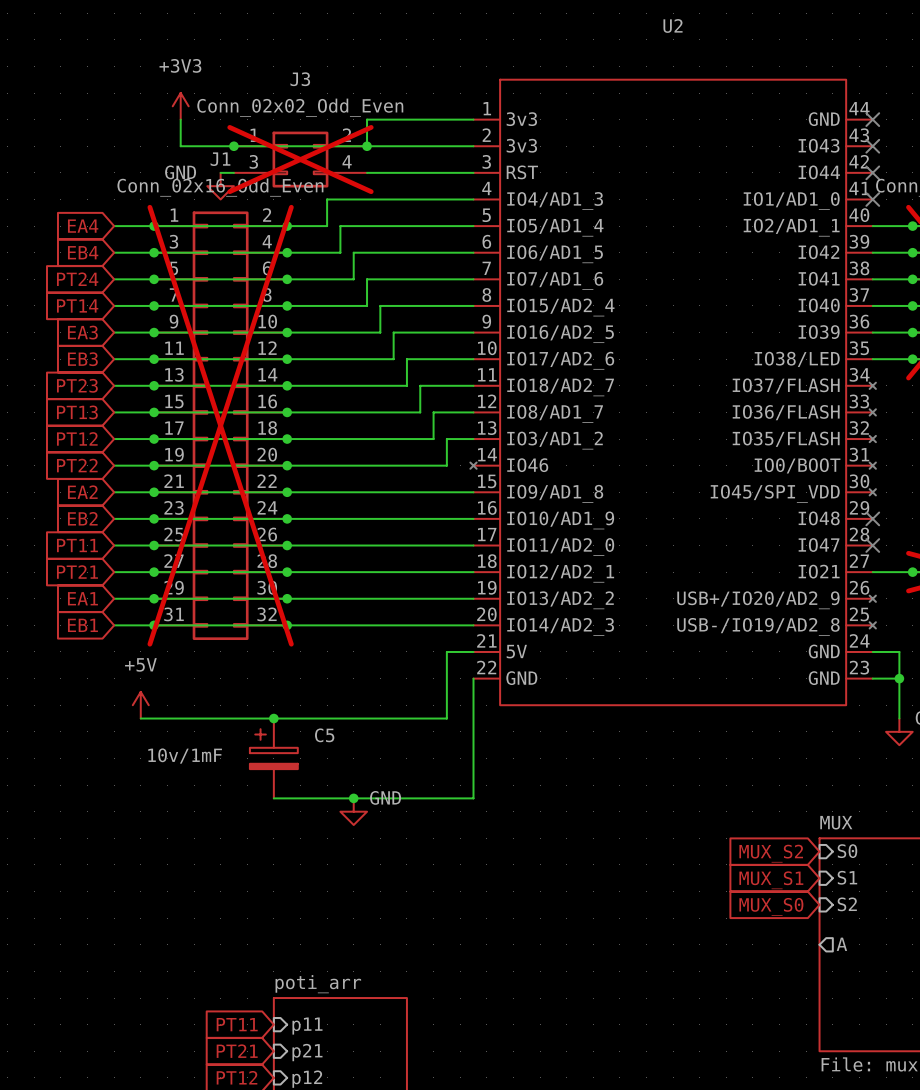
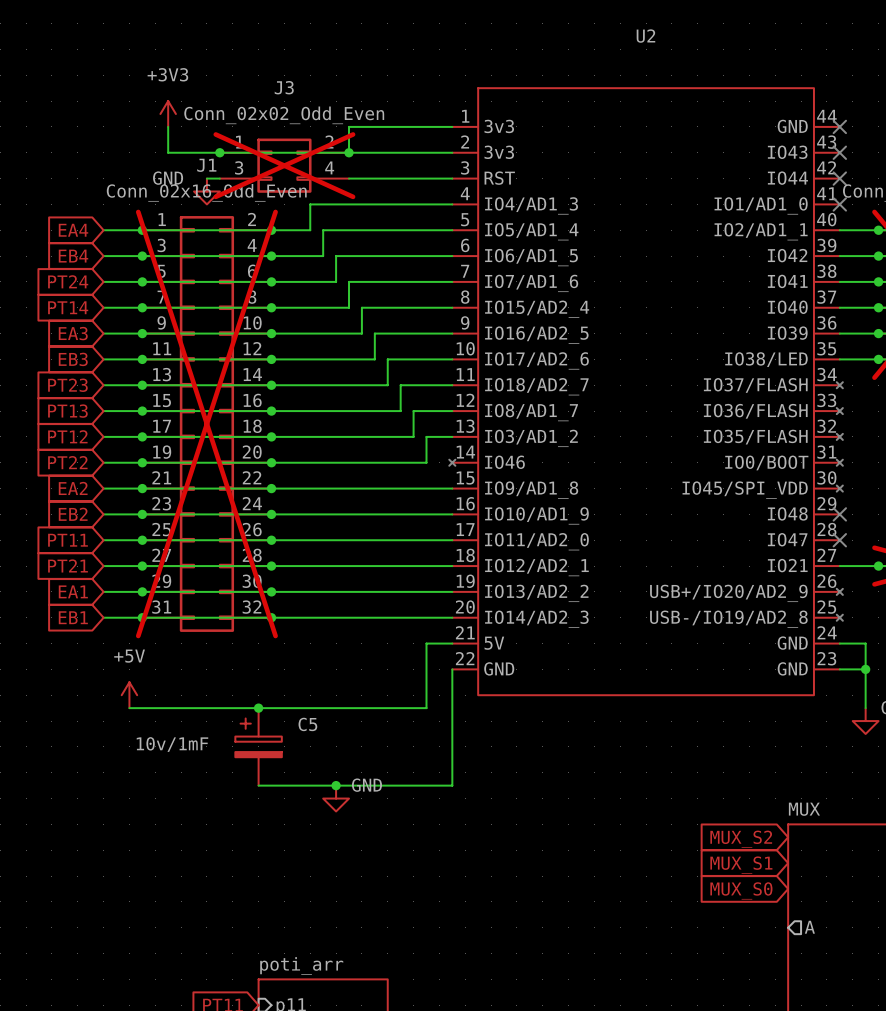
sheet pin: S0 (847, 851) -> none
sheet pin: S1 (847, 877) -> none
sheet pin: S2 (847, 904) -> none

